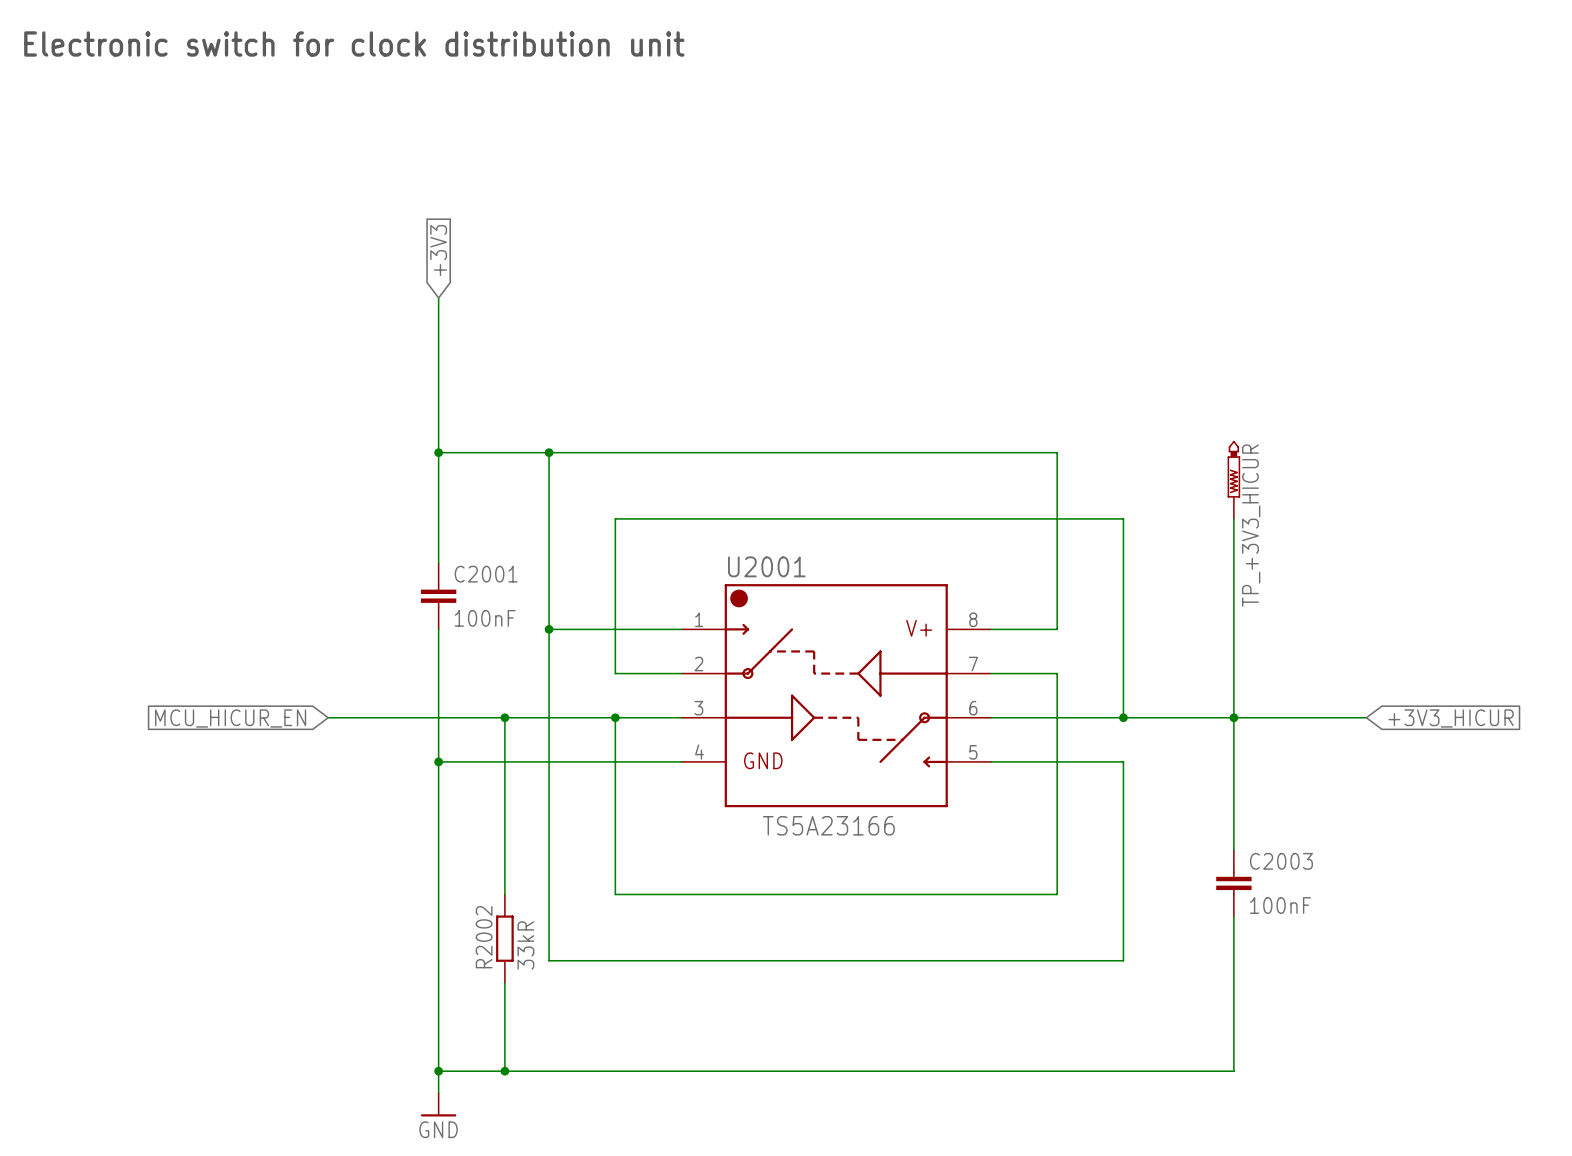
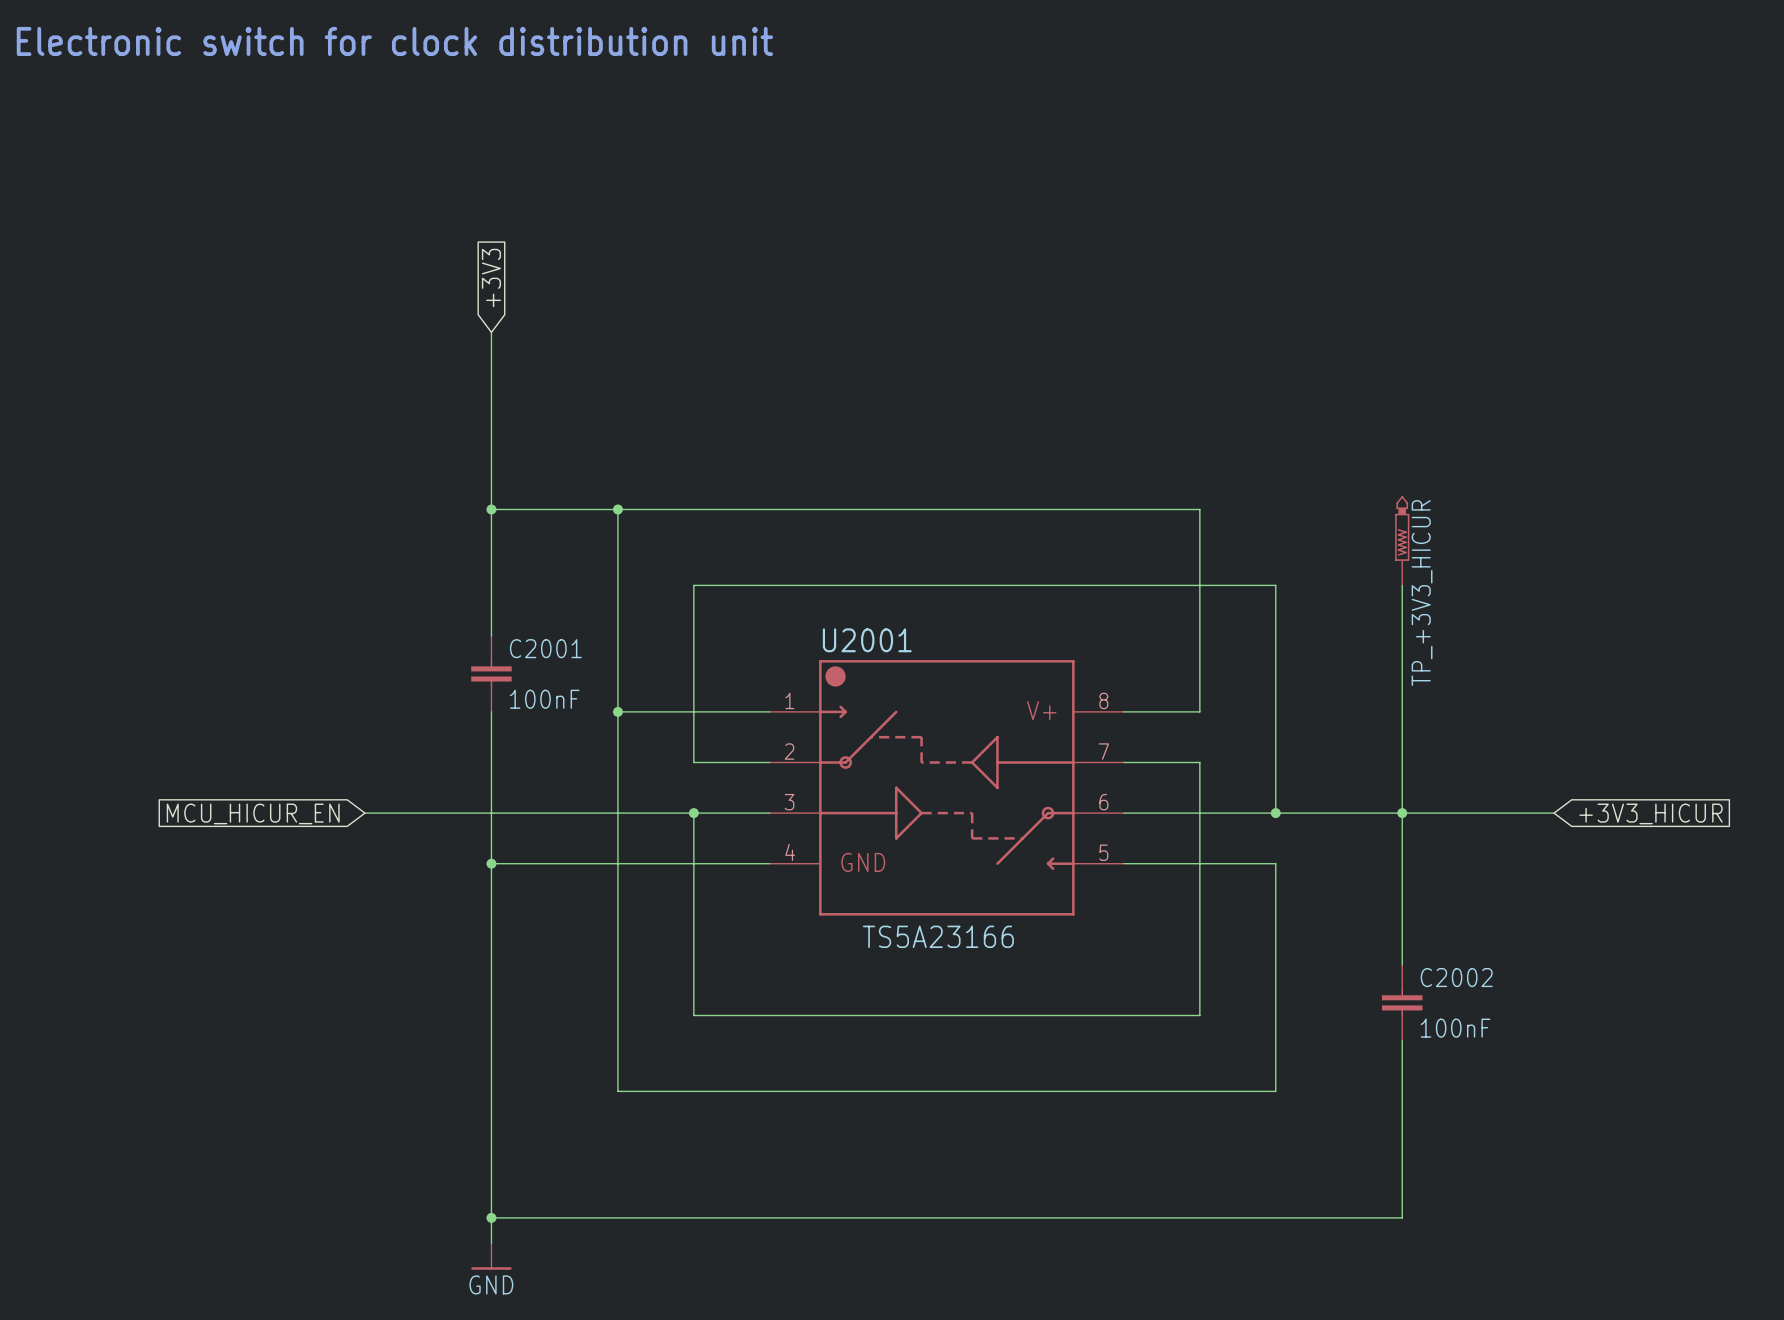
wire: (504, 717) (504, 894) -> none
junction: (504, 717) -> none
C2003 name: C2003 (1281, 861) -> C2002 (1456, 977)
R2002: 33kR (504, 938) -> none
wire: (504, 982) (504, 1071) -> none
junction: (504, 1071) -> none

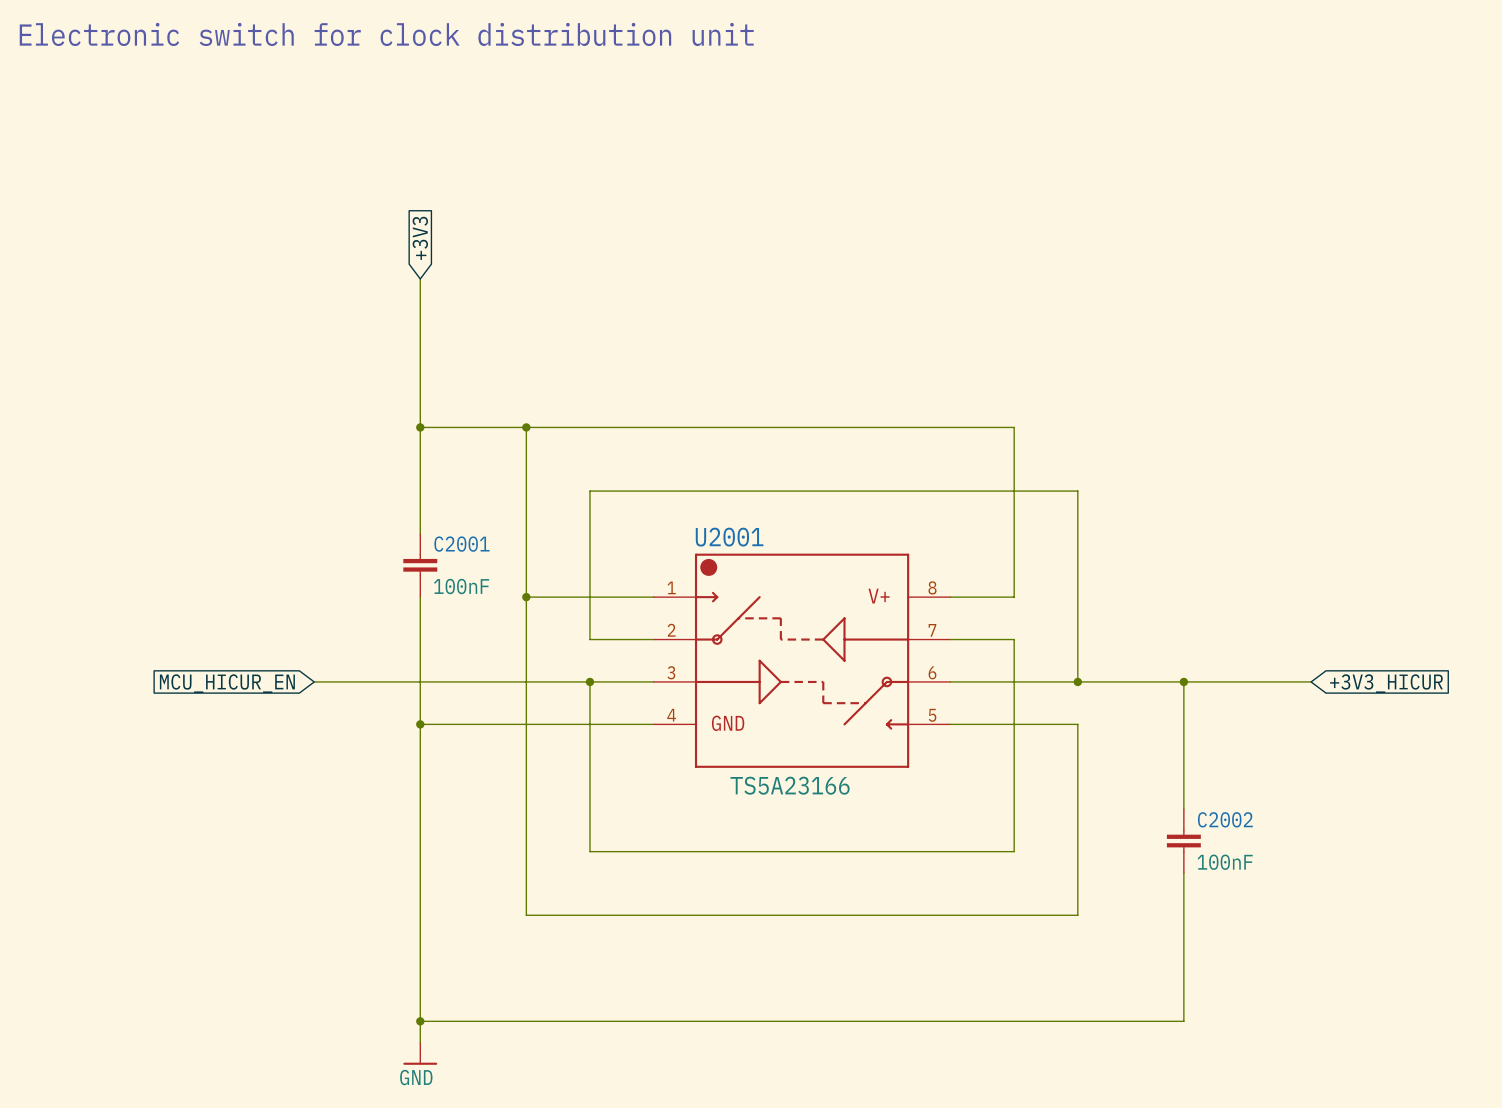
TP_+3V3_HICUR: (1402, 540) -> none
wire: (1402, 585) (1402, 813) -> none

